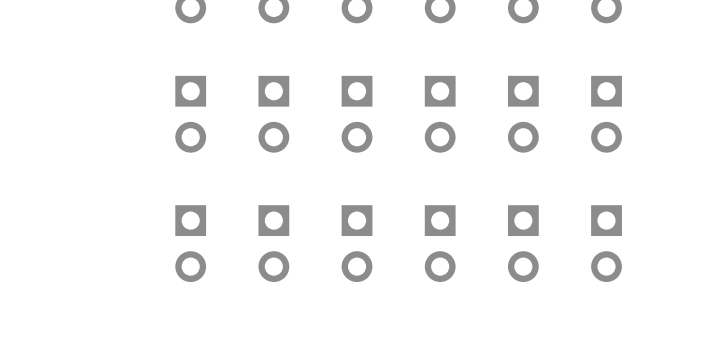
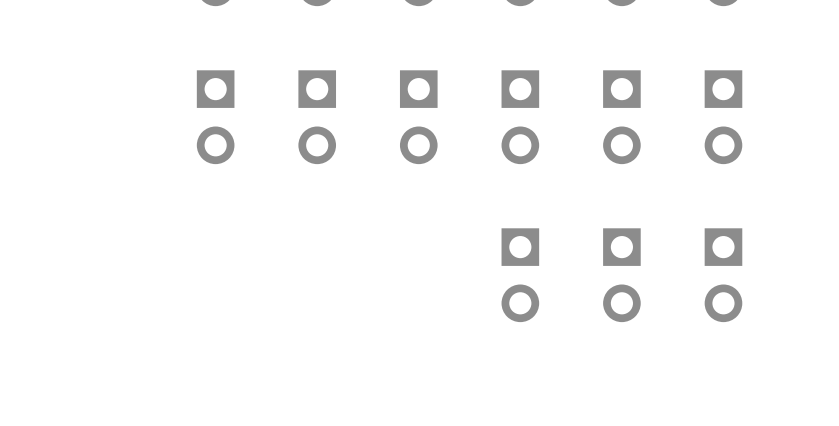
part: (190, 243) -> none
part: (273, 243) -> none
part: (357, 243) -> none

